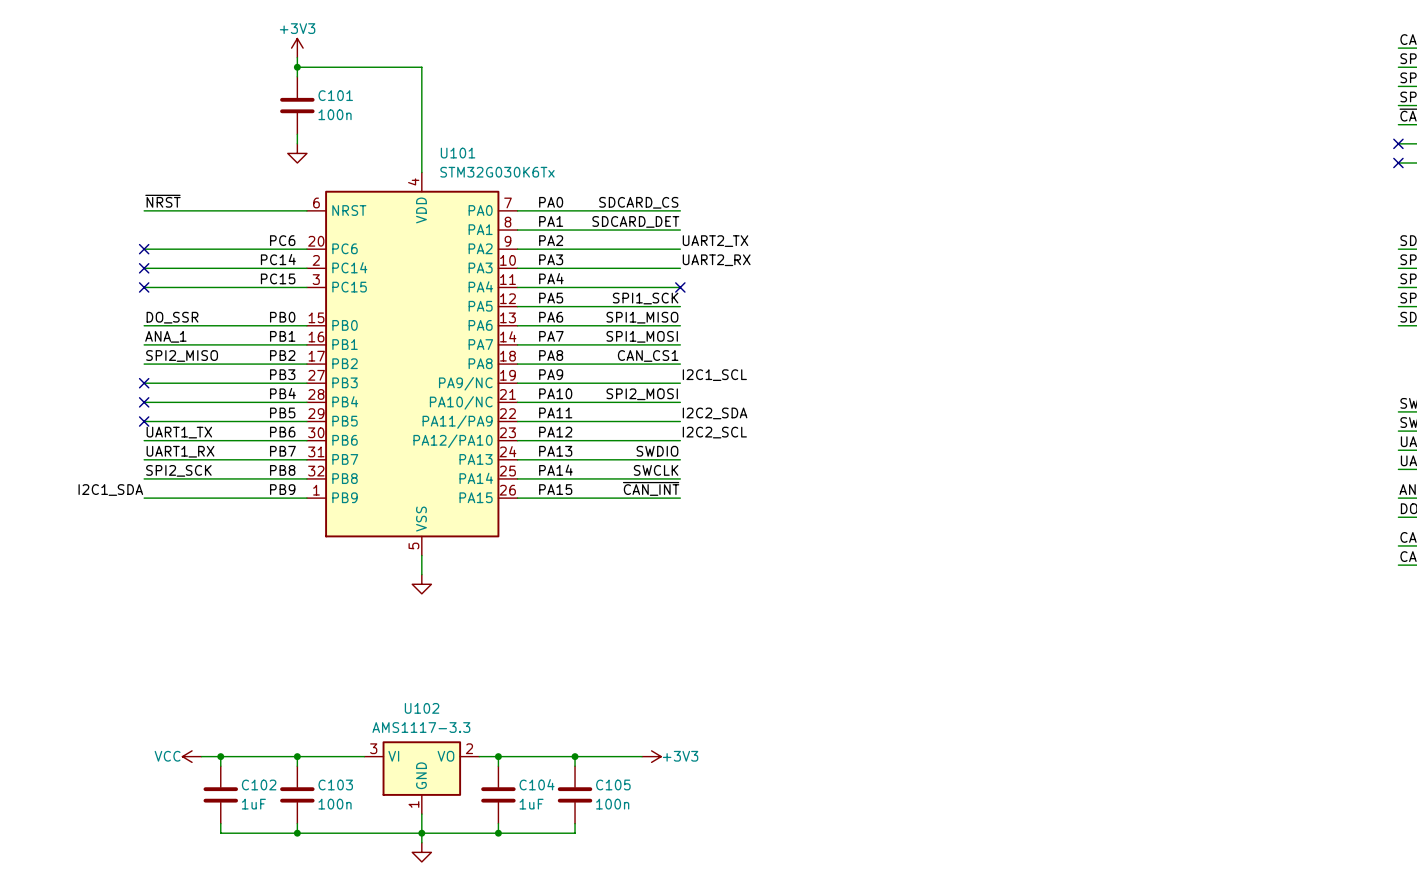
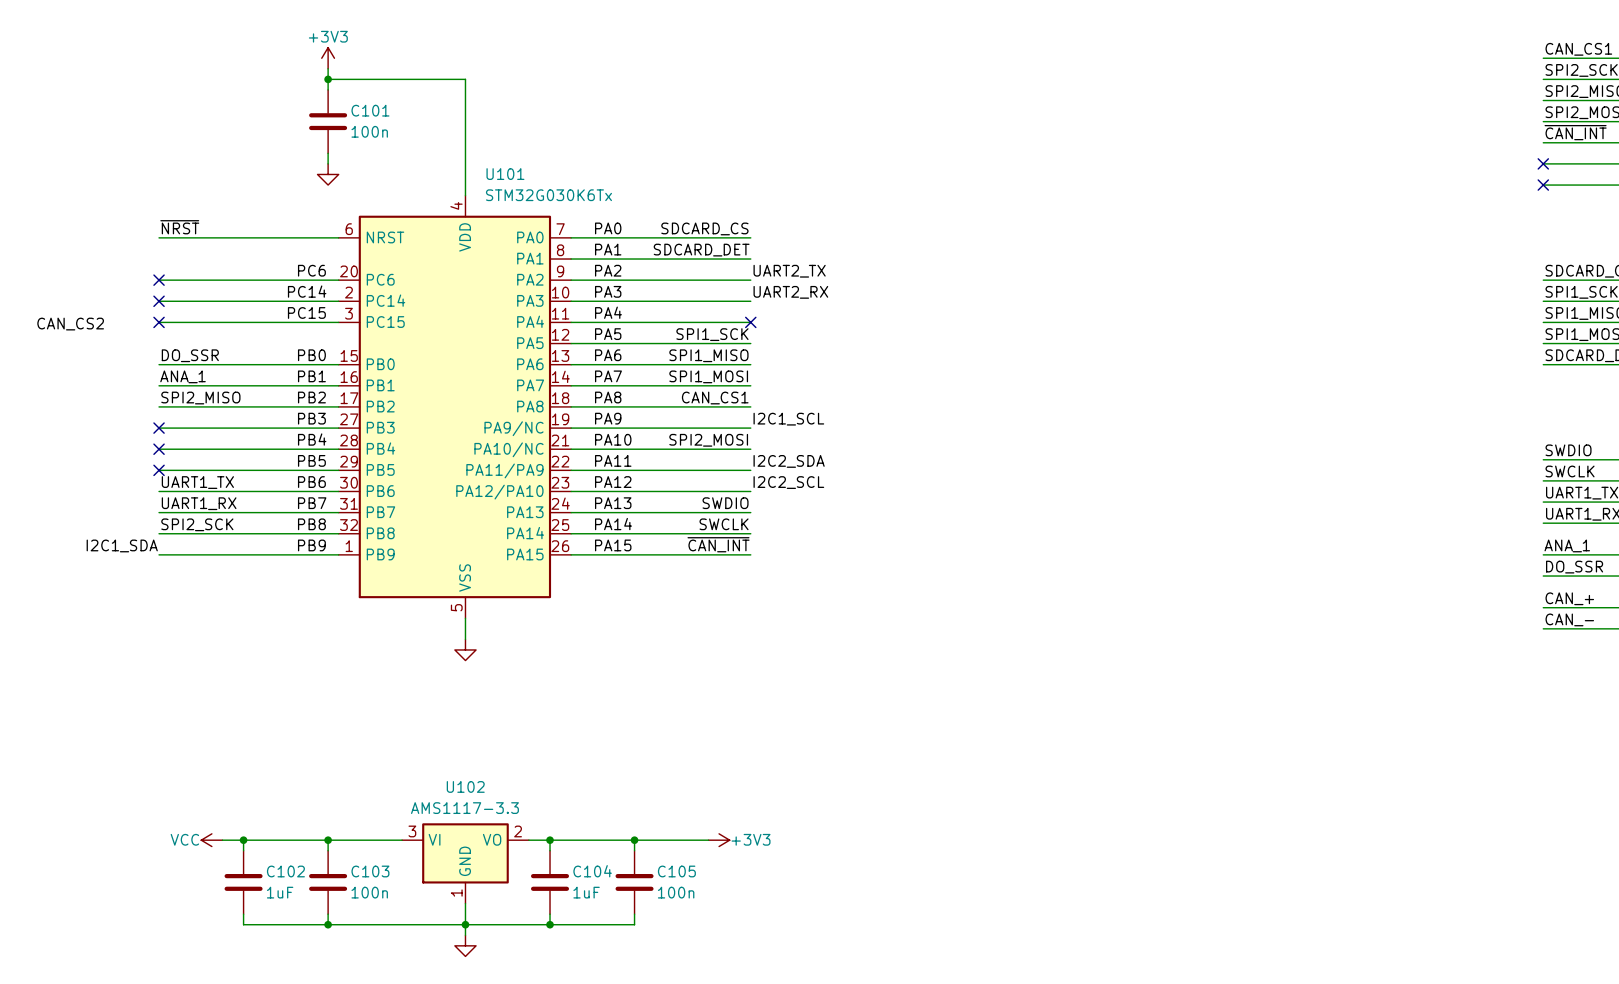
label: none -> CAN_CS2 (70, 324)

